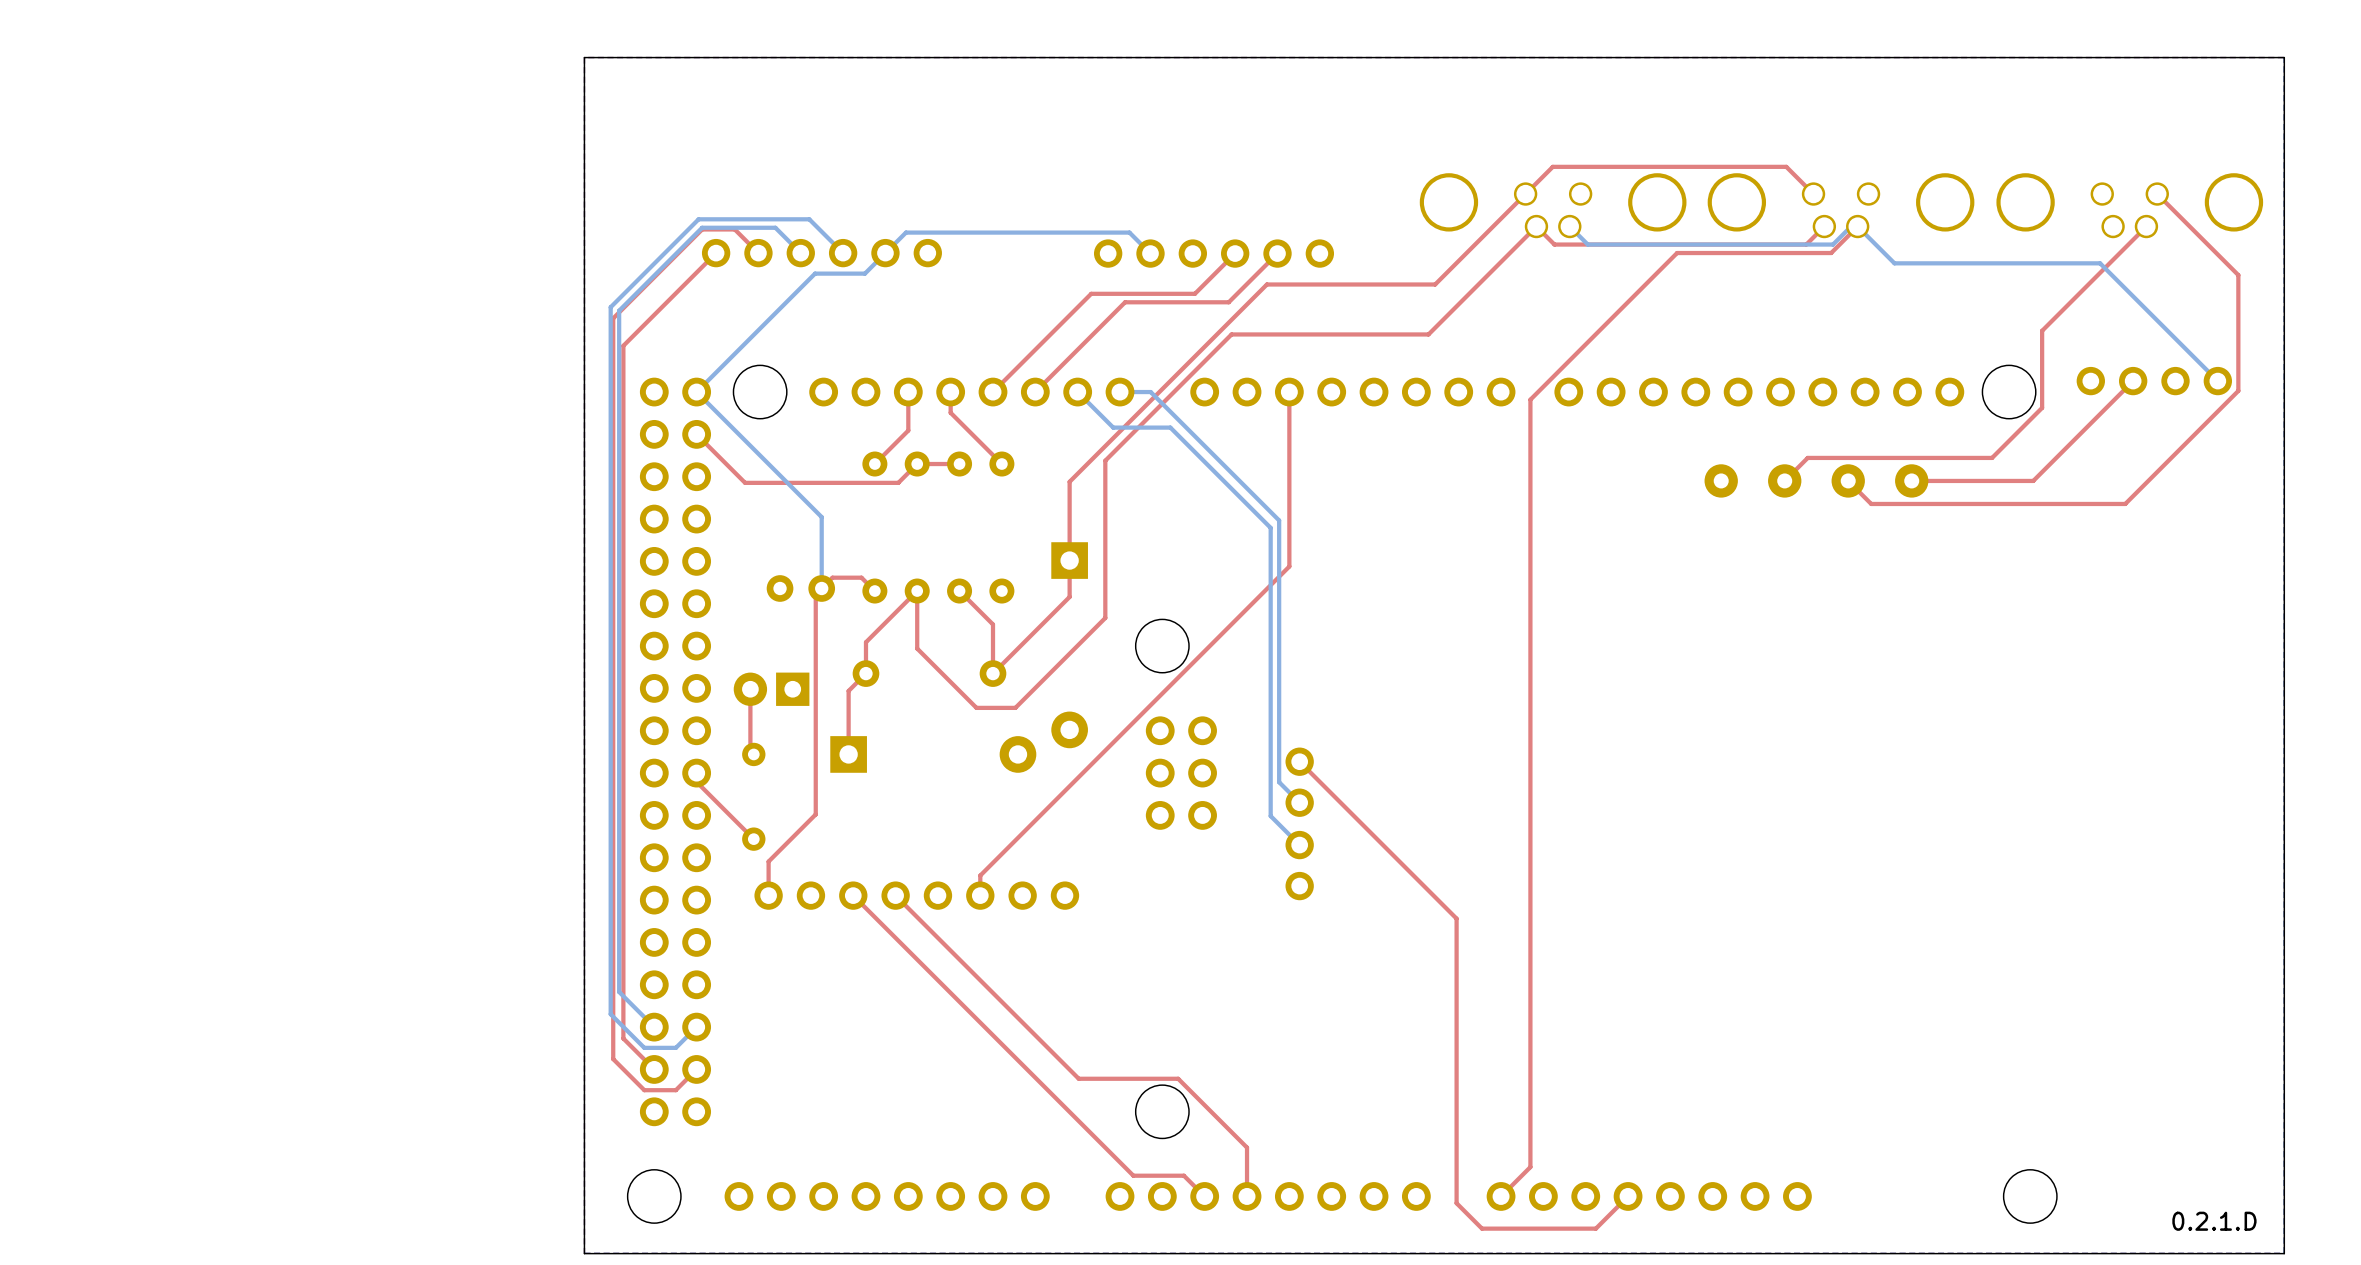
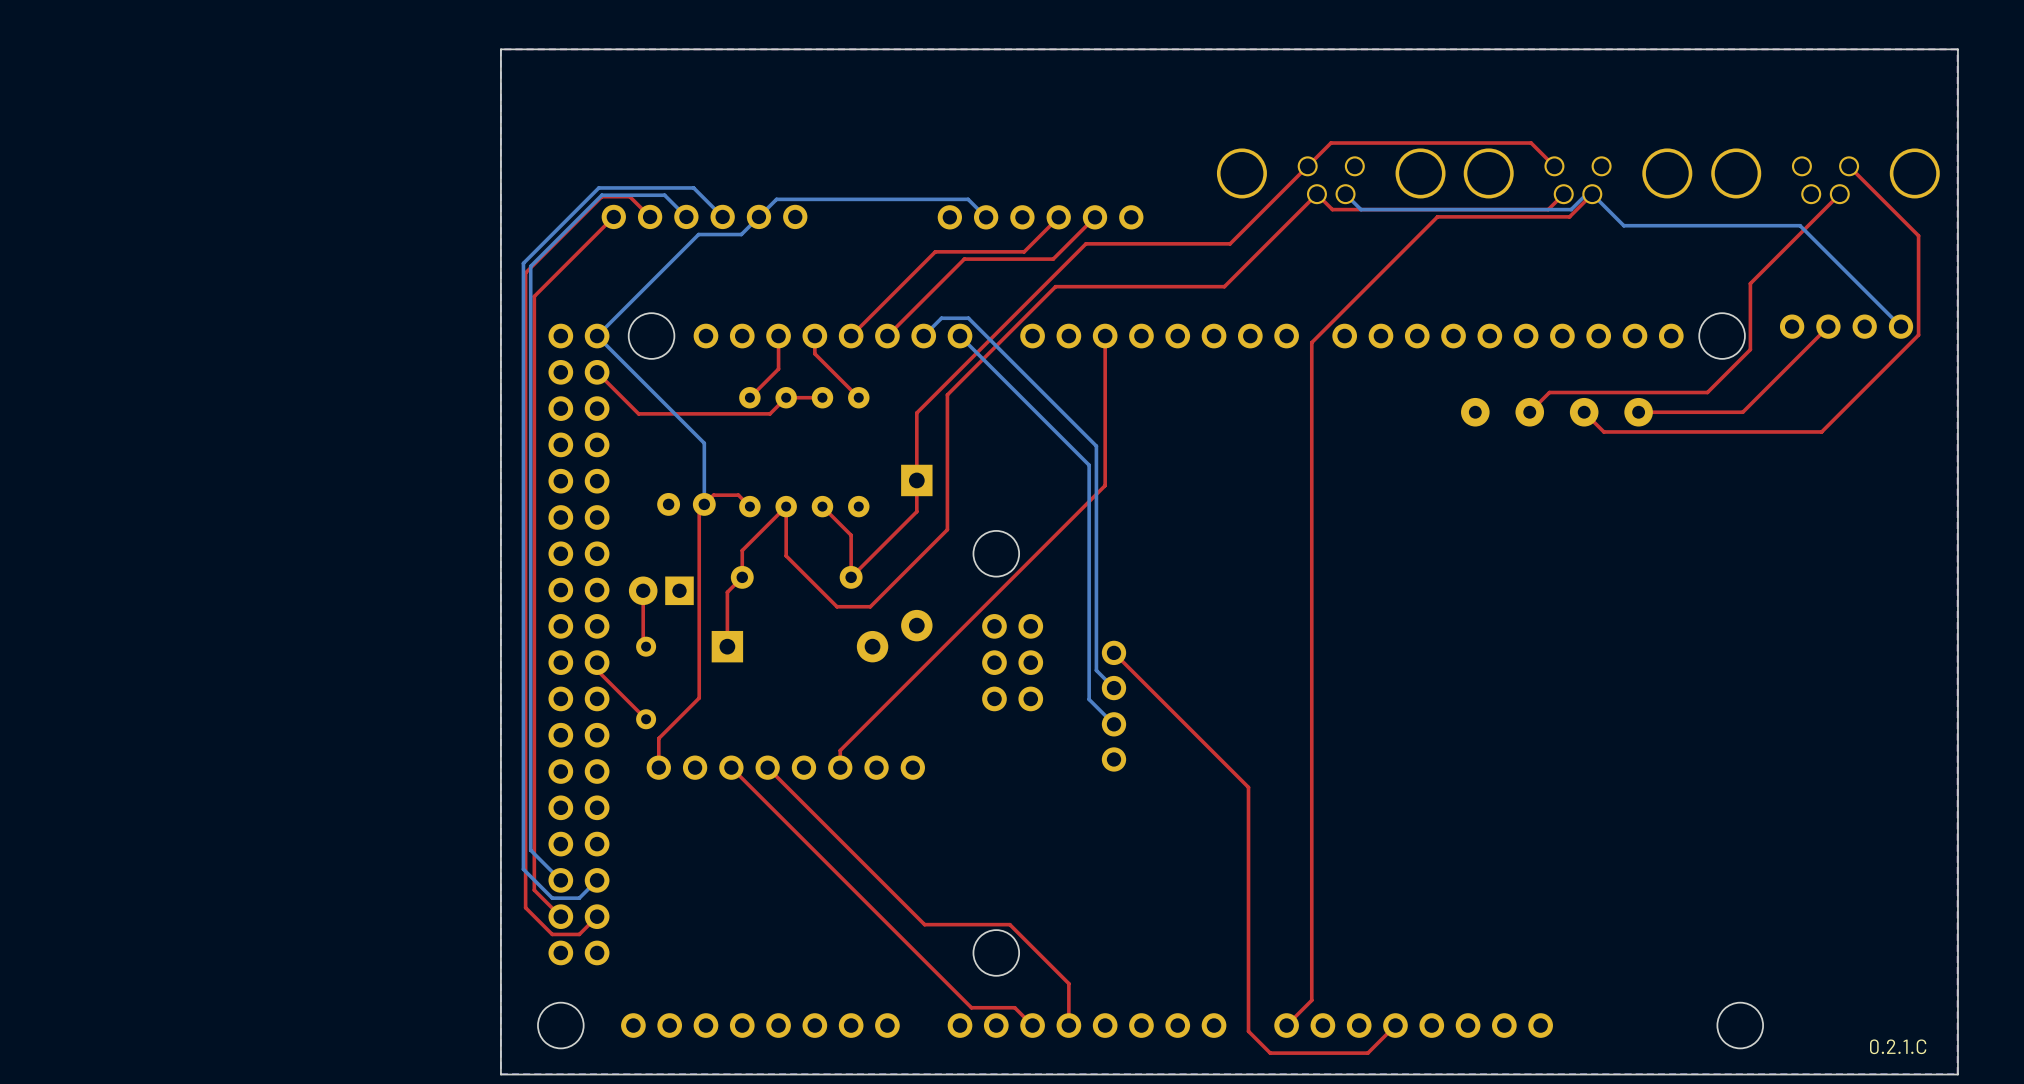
bottom track: (1077, 392) (1113, 427) (1170, 427) (1270, 527) (1270, 542) -> (960, 336) (1089, 465)
bottom track: (1150, 392) (1120, 392) -> (986, 336) (968, 318) (941, 318) (923, 336)
text: 0.2.1.D (2214, 1221) -> 0.2.1.C (1898, 1046)

